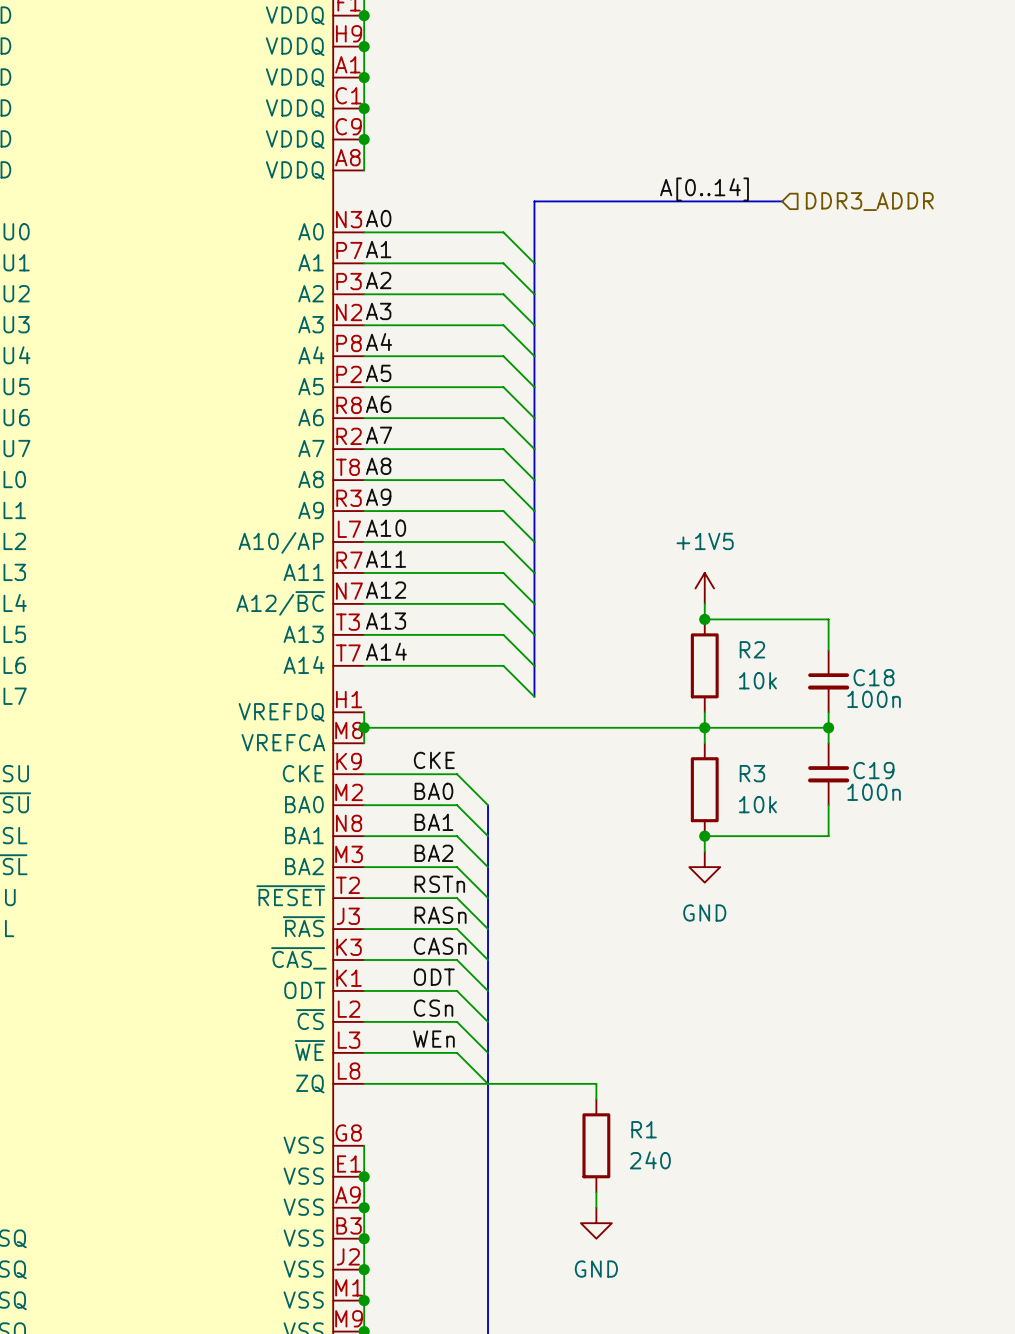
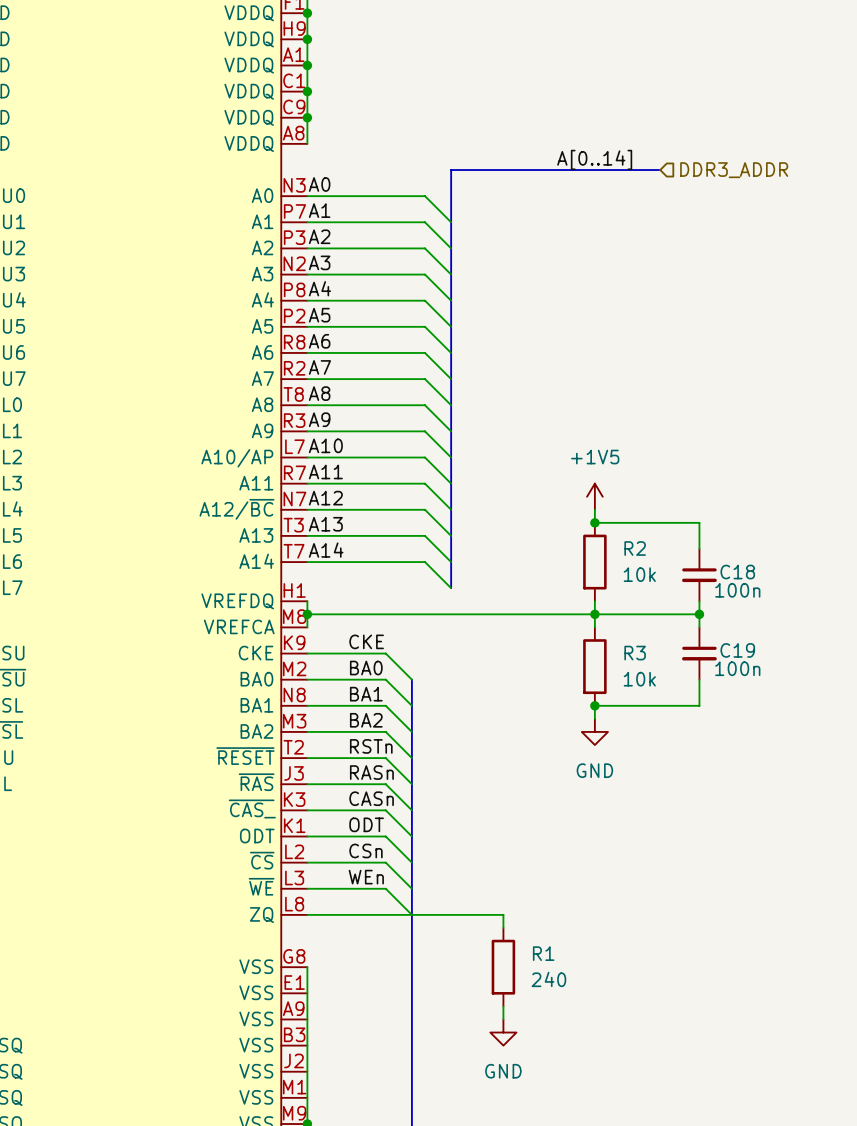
junction: (364, 1176) -> none
junction: (364, 1207) -> none
junction: (364, 1238) -> none
junction: (364, 1269) -> none
junction: (364, 1300) -> none

